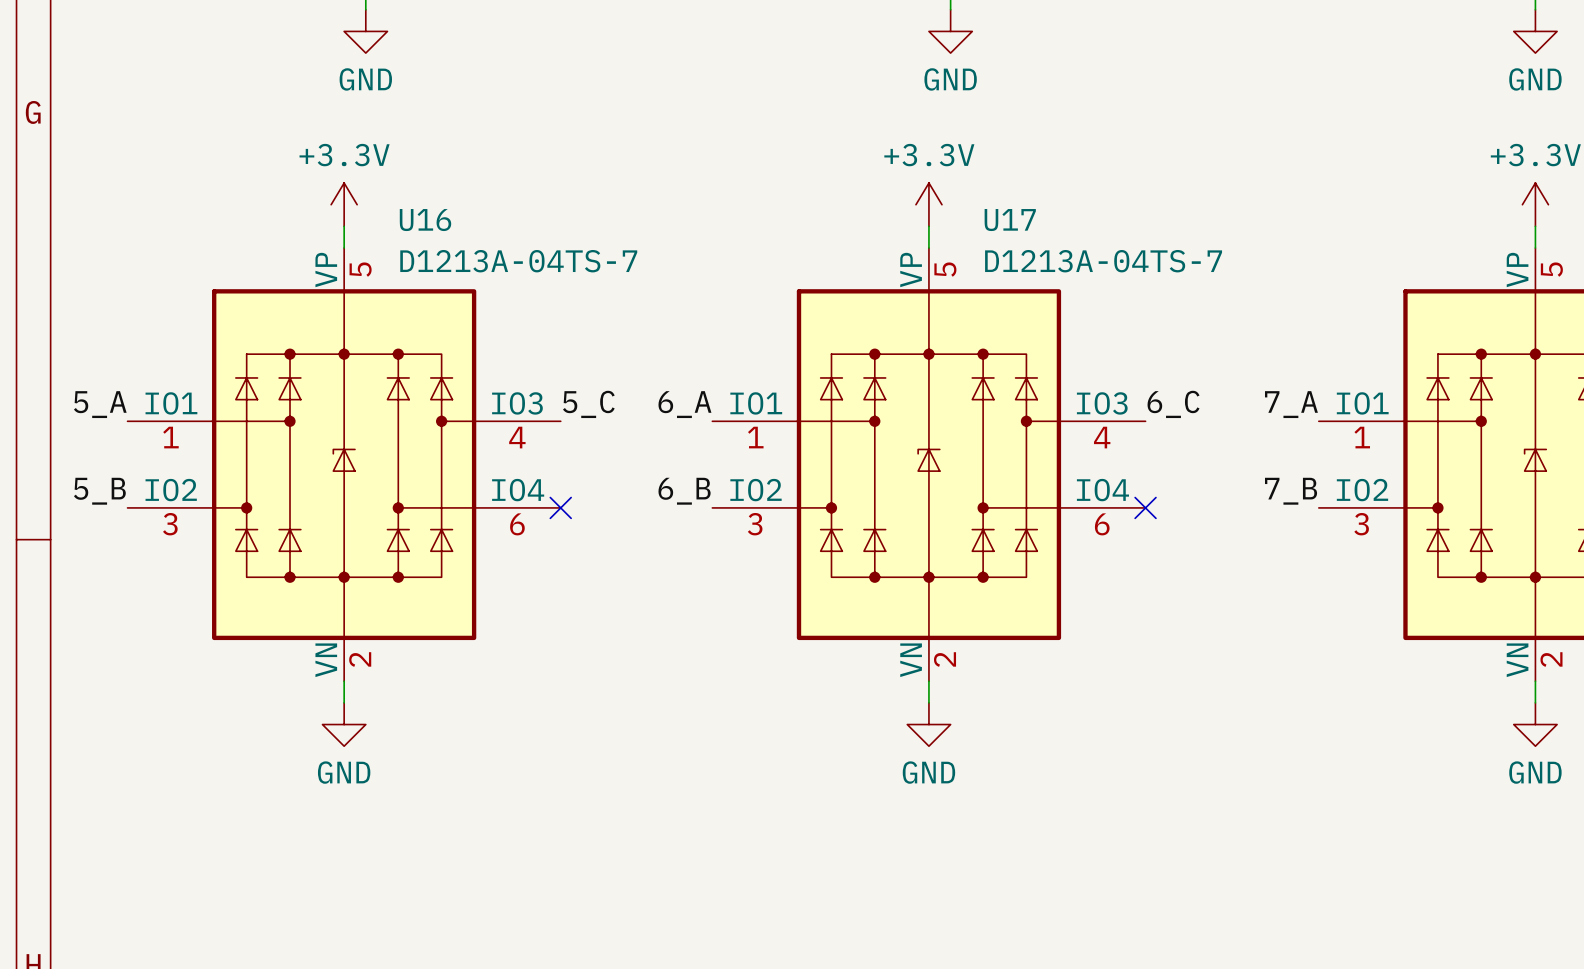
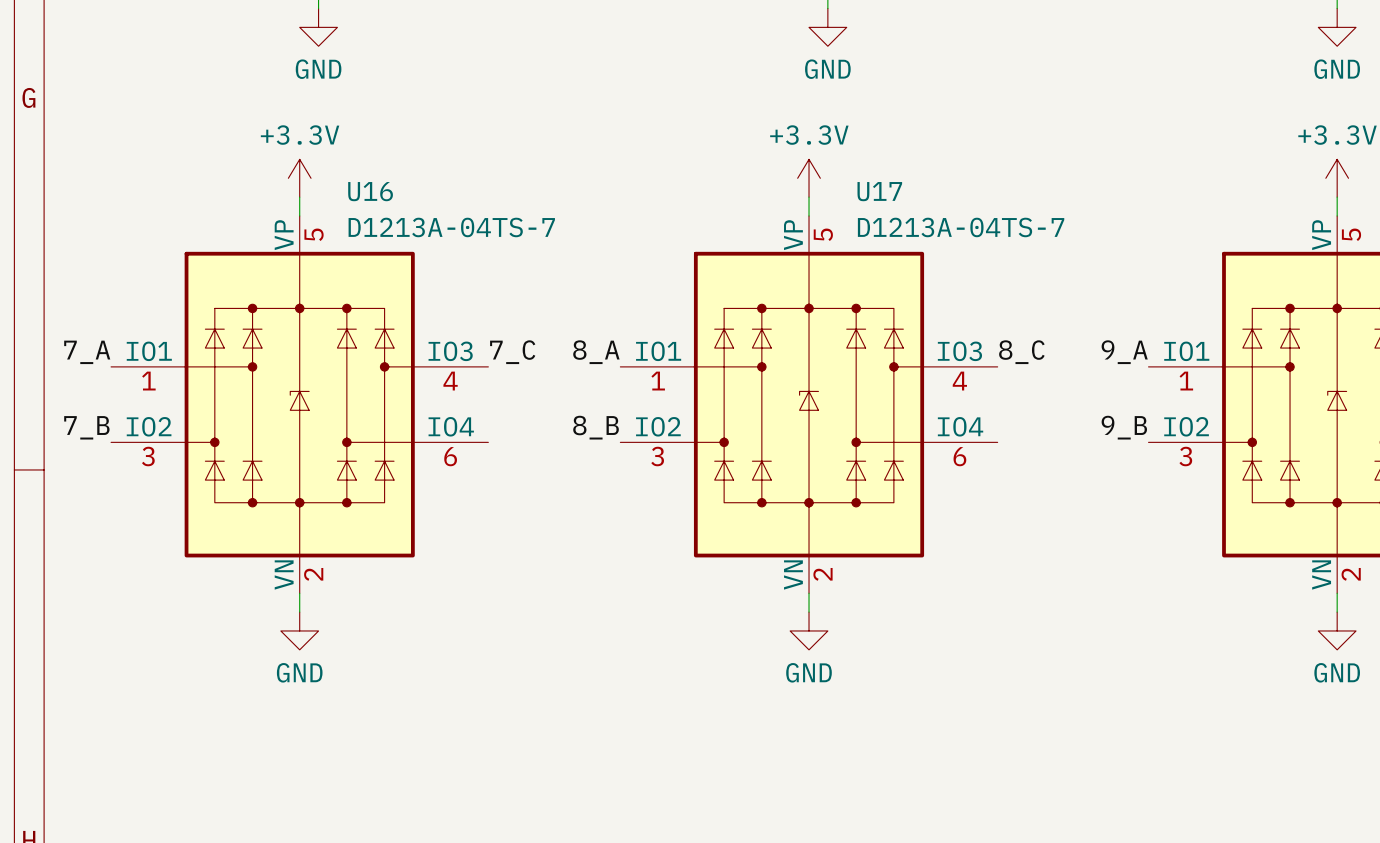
label: 5_A (100, 404) -> 7_A (87, 352)
label: 5_C (588, 404) -> 7_C (512, 352)
label: 6_A (684, 404) -> 8_A (596, 352)
label: 6_C (1173, 404) -> 8_C (1021, 352)
label: 7_A (1291, 404) -> 9_A (1124, 352)
label: 5_B (99, 491) -> 7_B (86, 427)
label: 6_B (684, 491) -> 8_B (596, 427)
label: 7_B (1291, 491) -> 9_B (1124, 427)
no-connect mark: (560, 507) -> none
no-connect mark: (1145, 507) -> none

